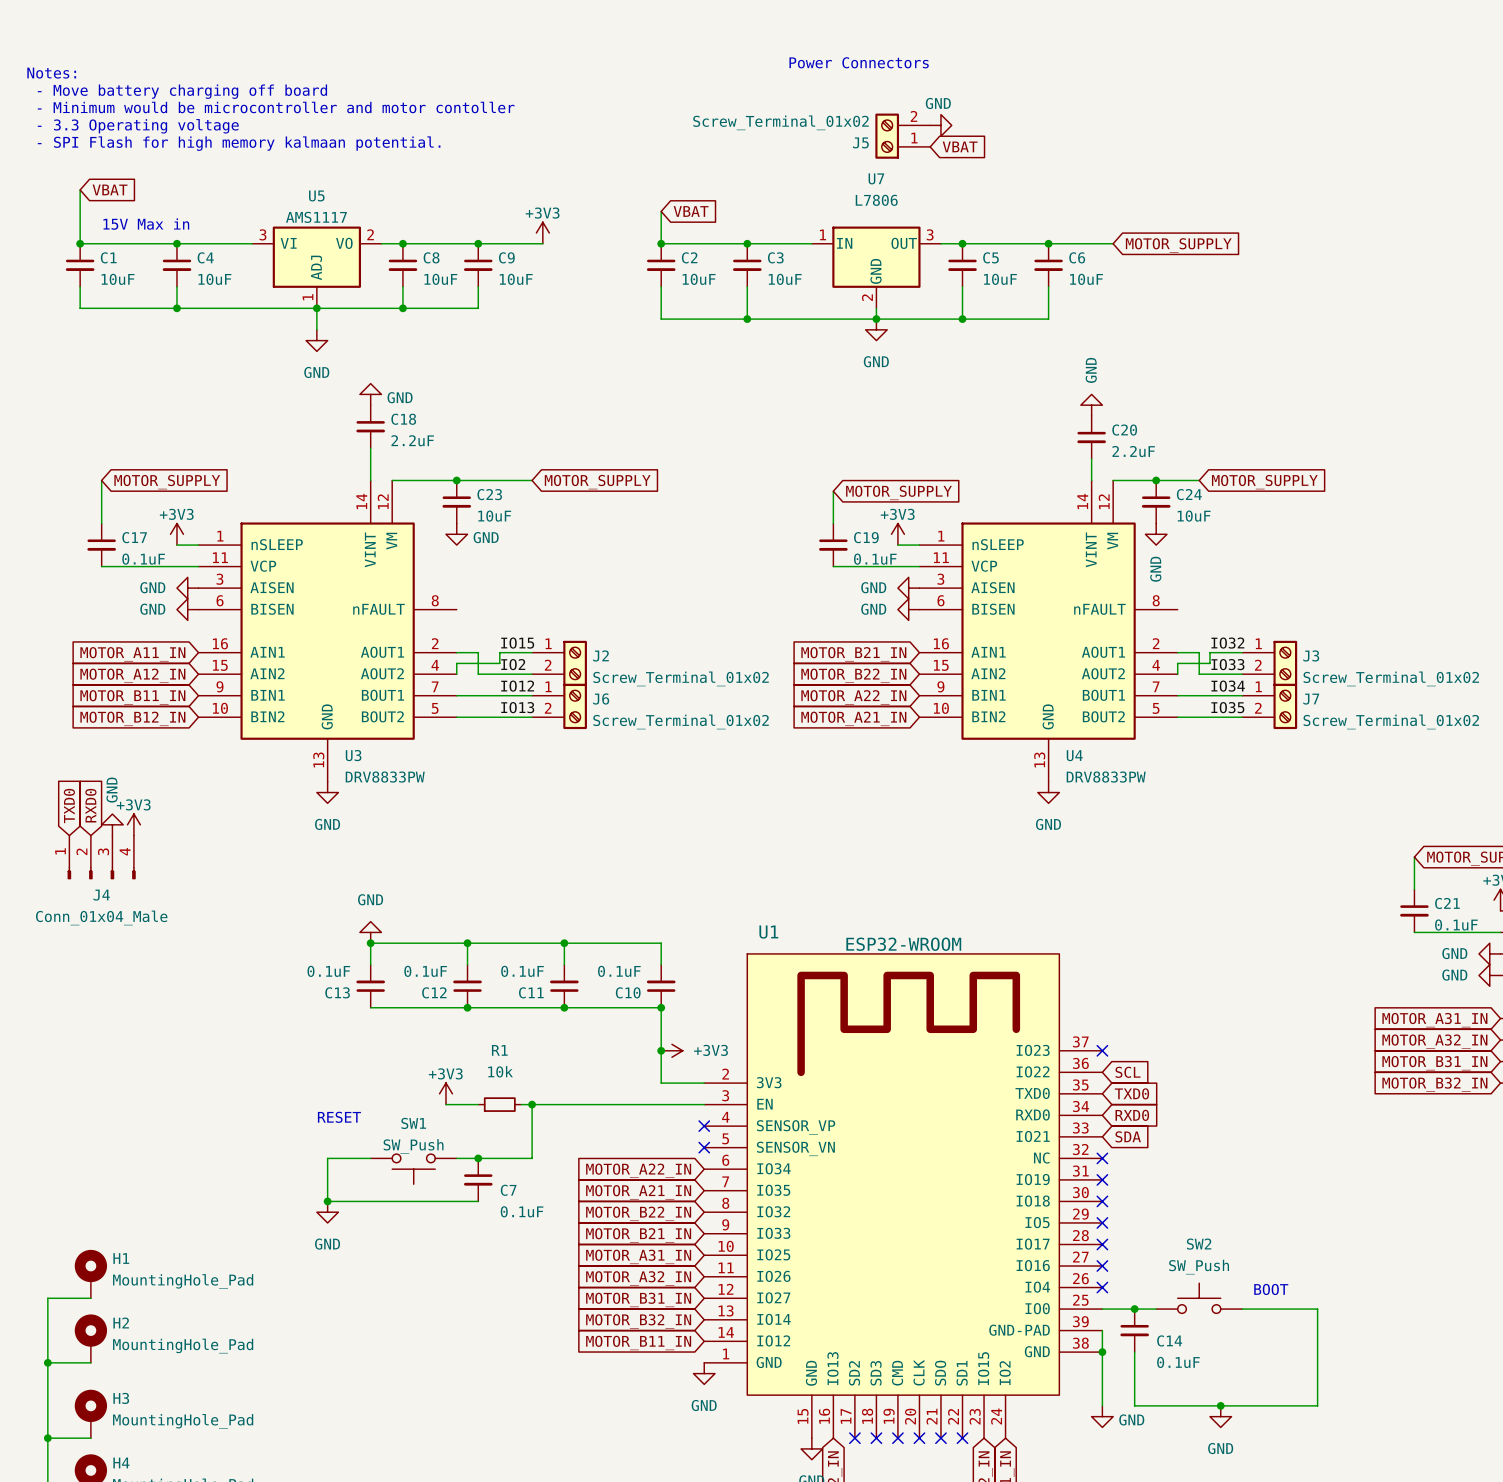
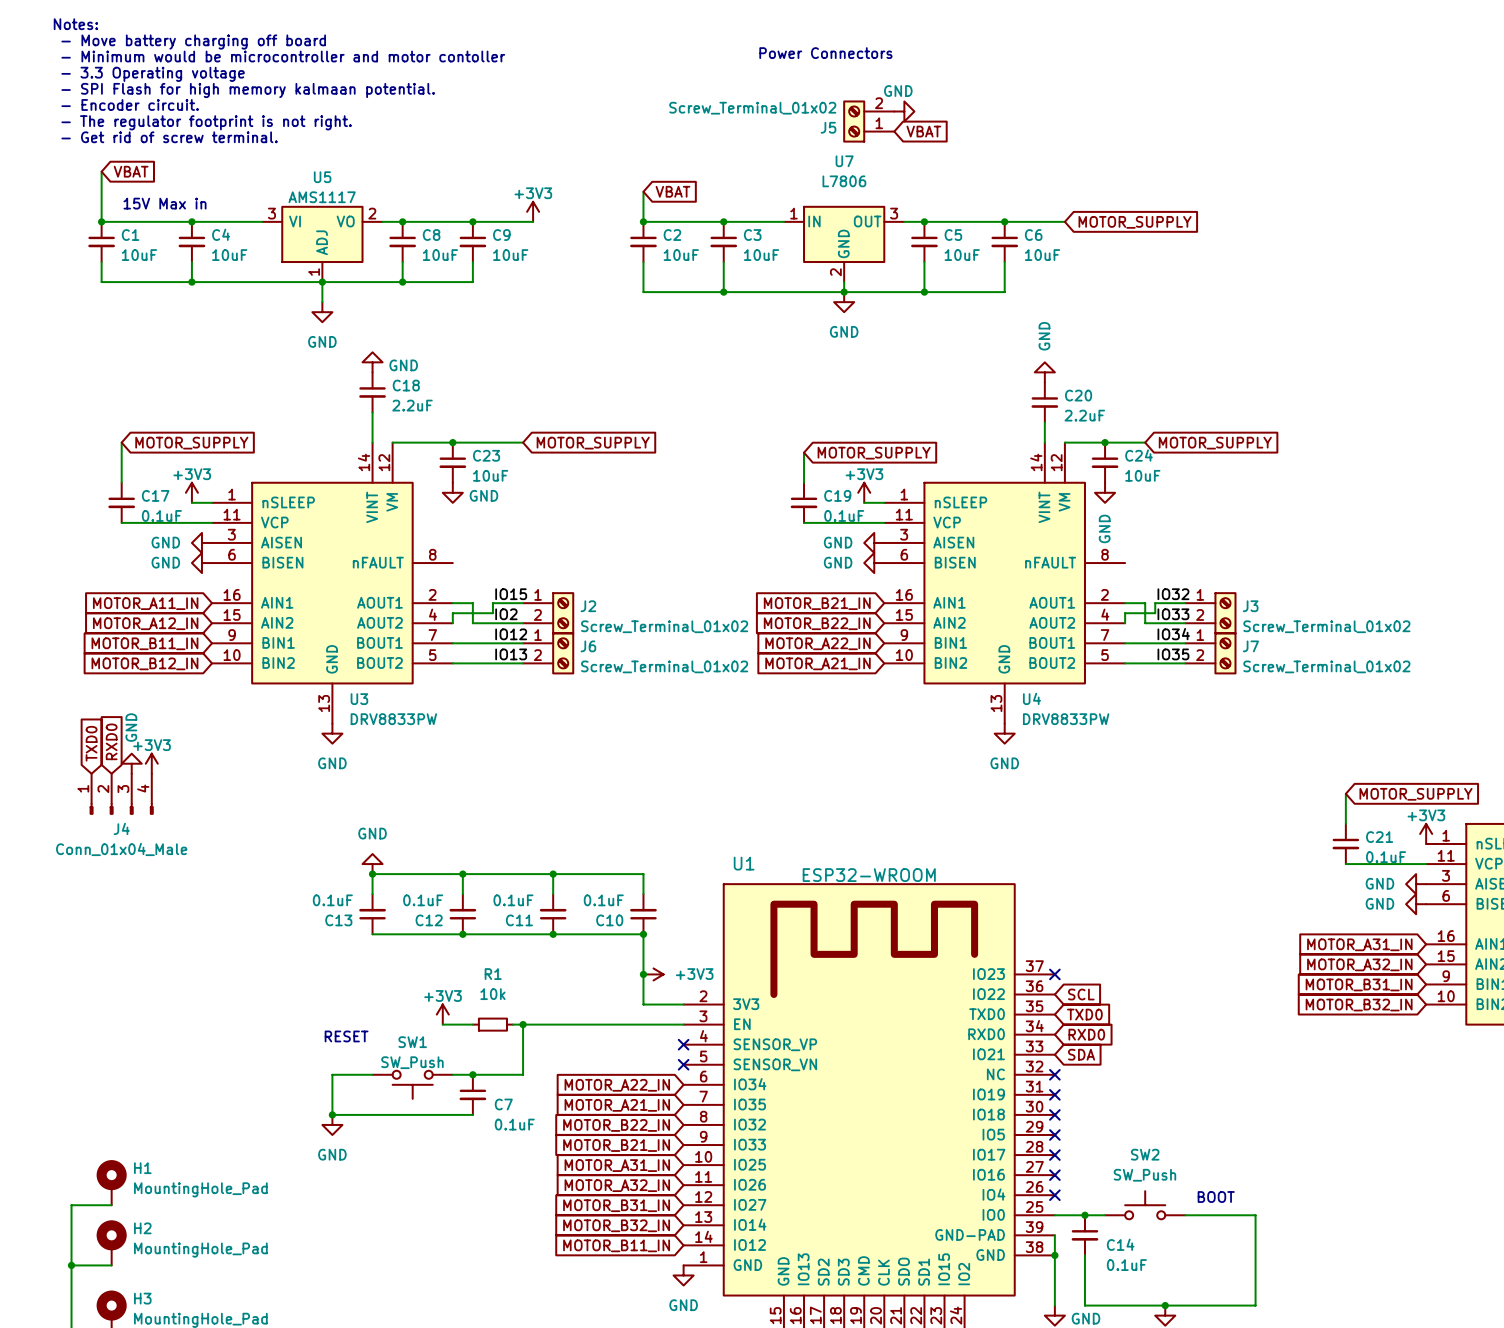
text position: Notes: (51, 73) -> Notes: (75, 24)
text position: - Move battery charging off board (182, 91) -> - Move battery charging off board (193, 42)
text position: - Minimum would be microcontroller and motor contoller (276, 107) -> - Minimum would be microcontroller and motor contoller (283, 56)
text: none -> - Encoder circuit. (130, 104)
text position: - 3.3 Operating voltage (138, 126) -> - 3.3 Operating voltage (153, 74)
text: none -> - The regulator footprint is not right. (206, 122)
text position: - SPI Flash for high memory kalmaan potential. (239, 143) -> - SPI Flash for high memory kalmaan potential. (248, 90)
text: none -> - Get rid of screw terminal. (169, 137)

